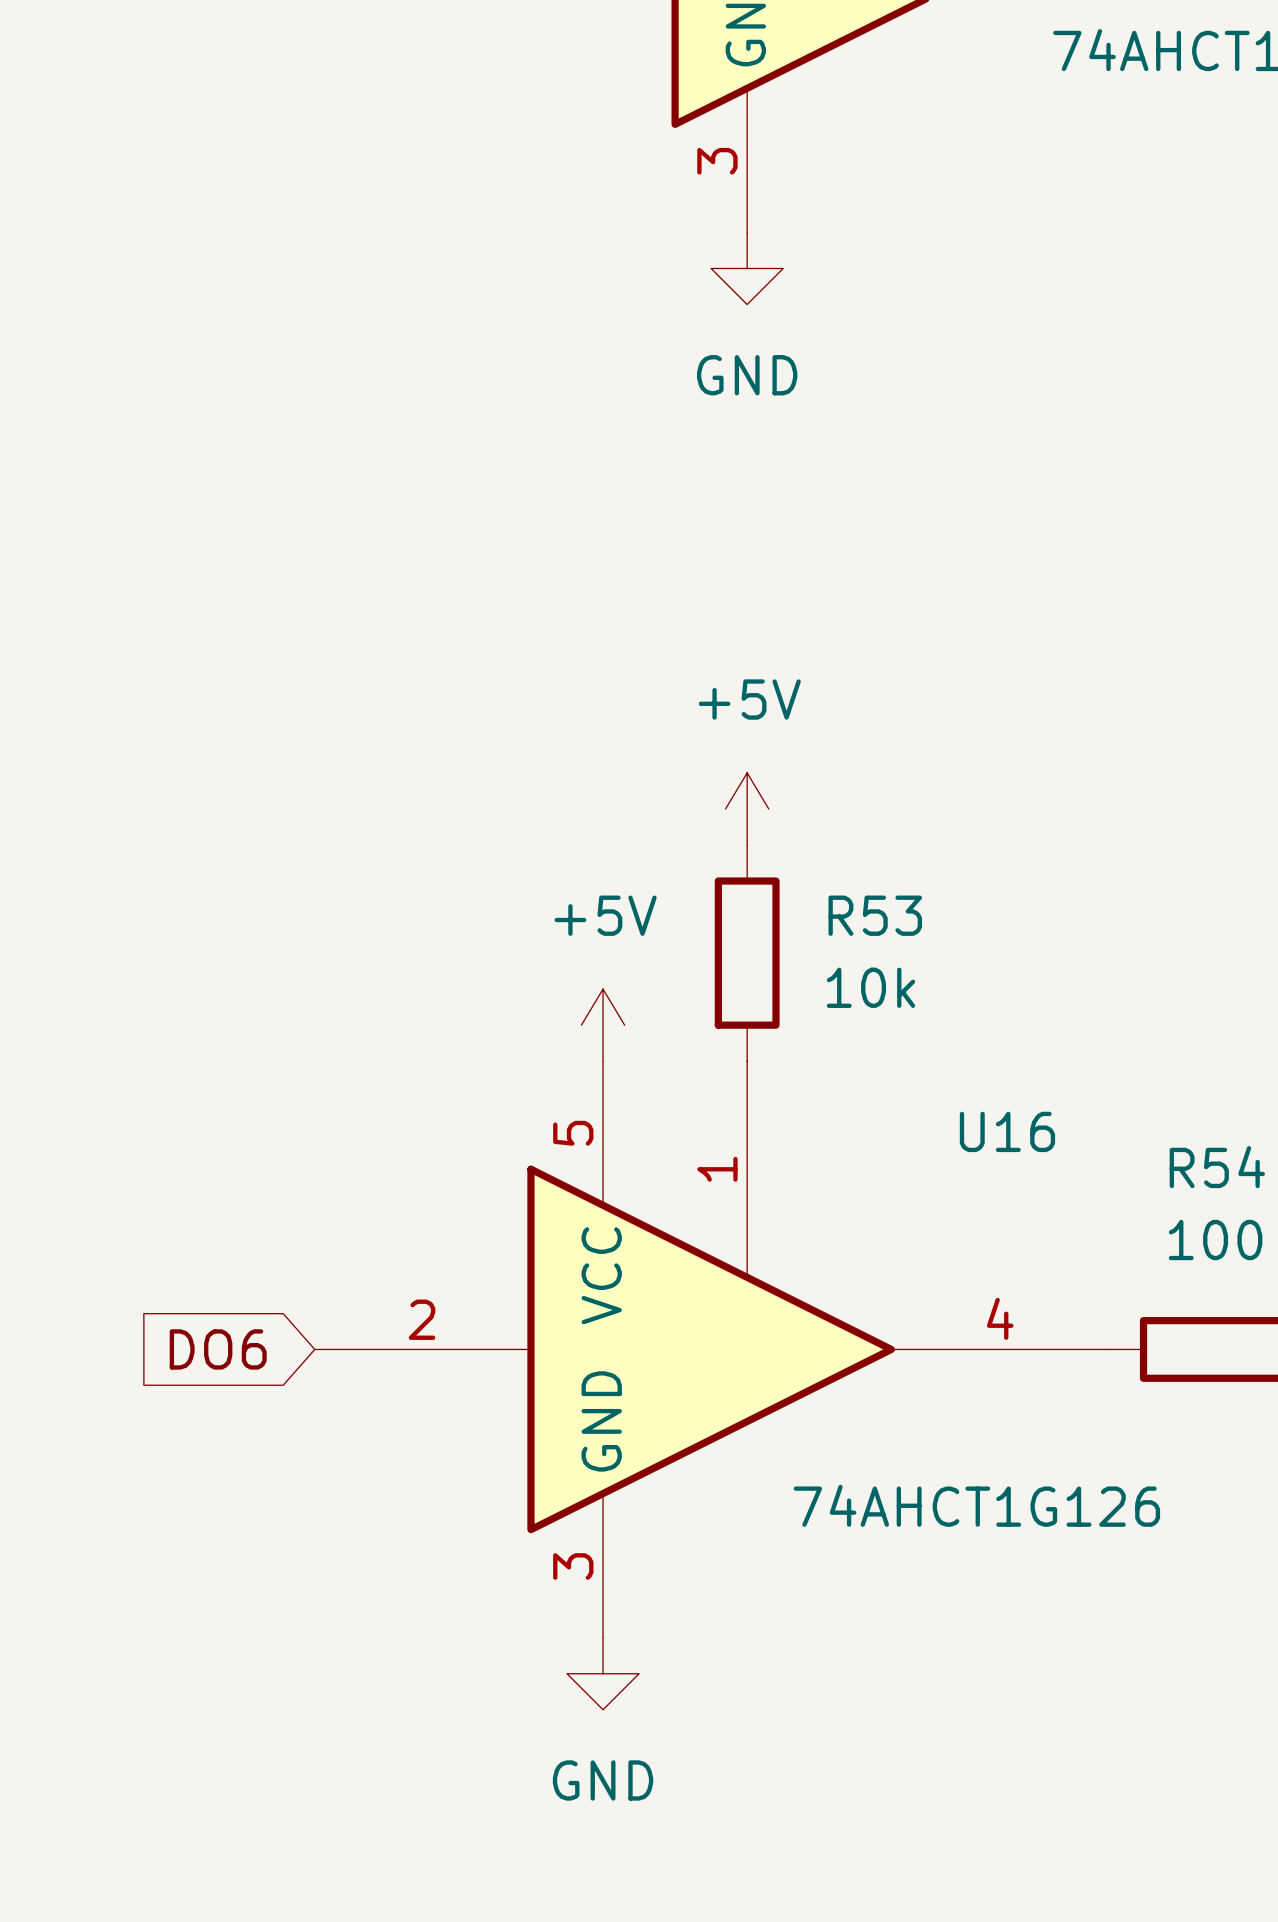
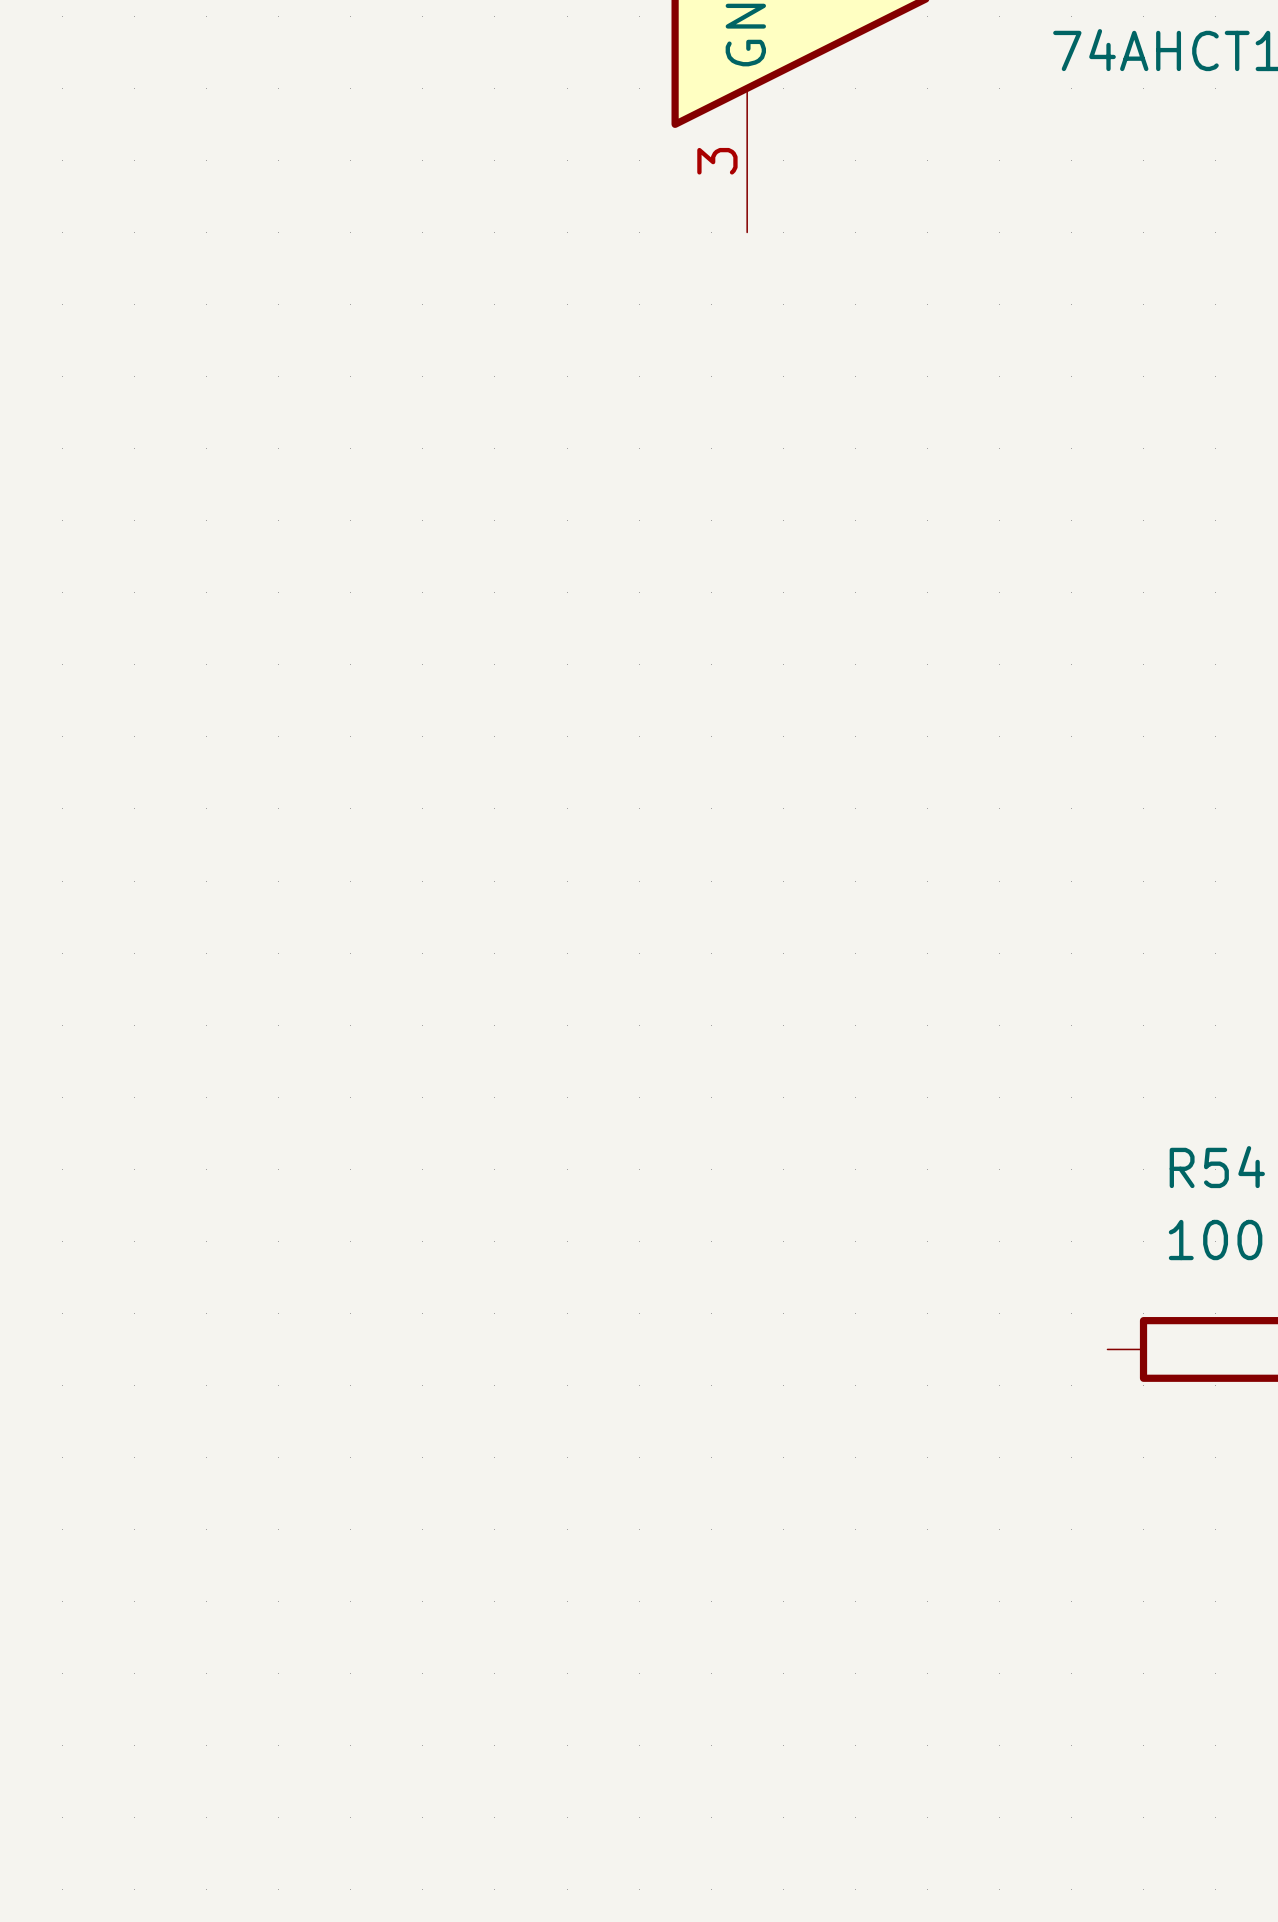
power symbol: GND (747, 268) -> none
power symbol: +5V (747, 808) -> none
R53: 10k (747, 953) -> none
power symbol: +5V (603, 1025) -> none
global label: DO6 (218, 1349) -> none
U16: 74AHCT1G126 (711, 1349) -> none
power symbol: GND (603, 1673) -> none

